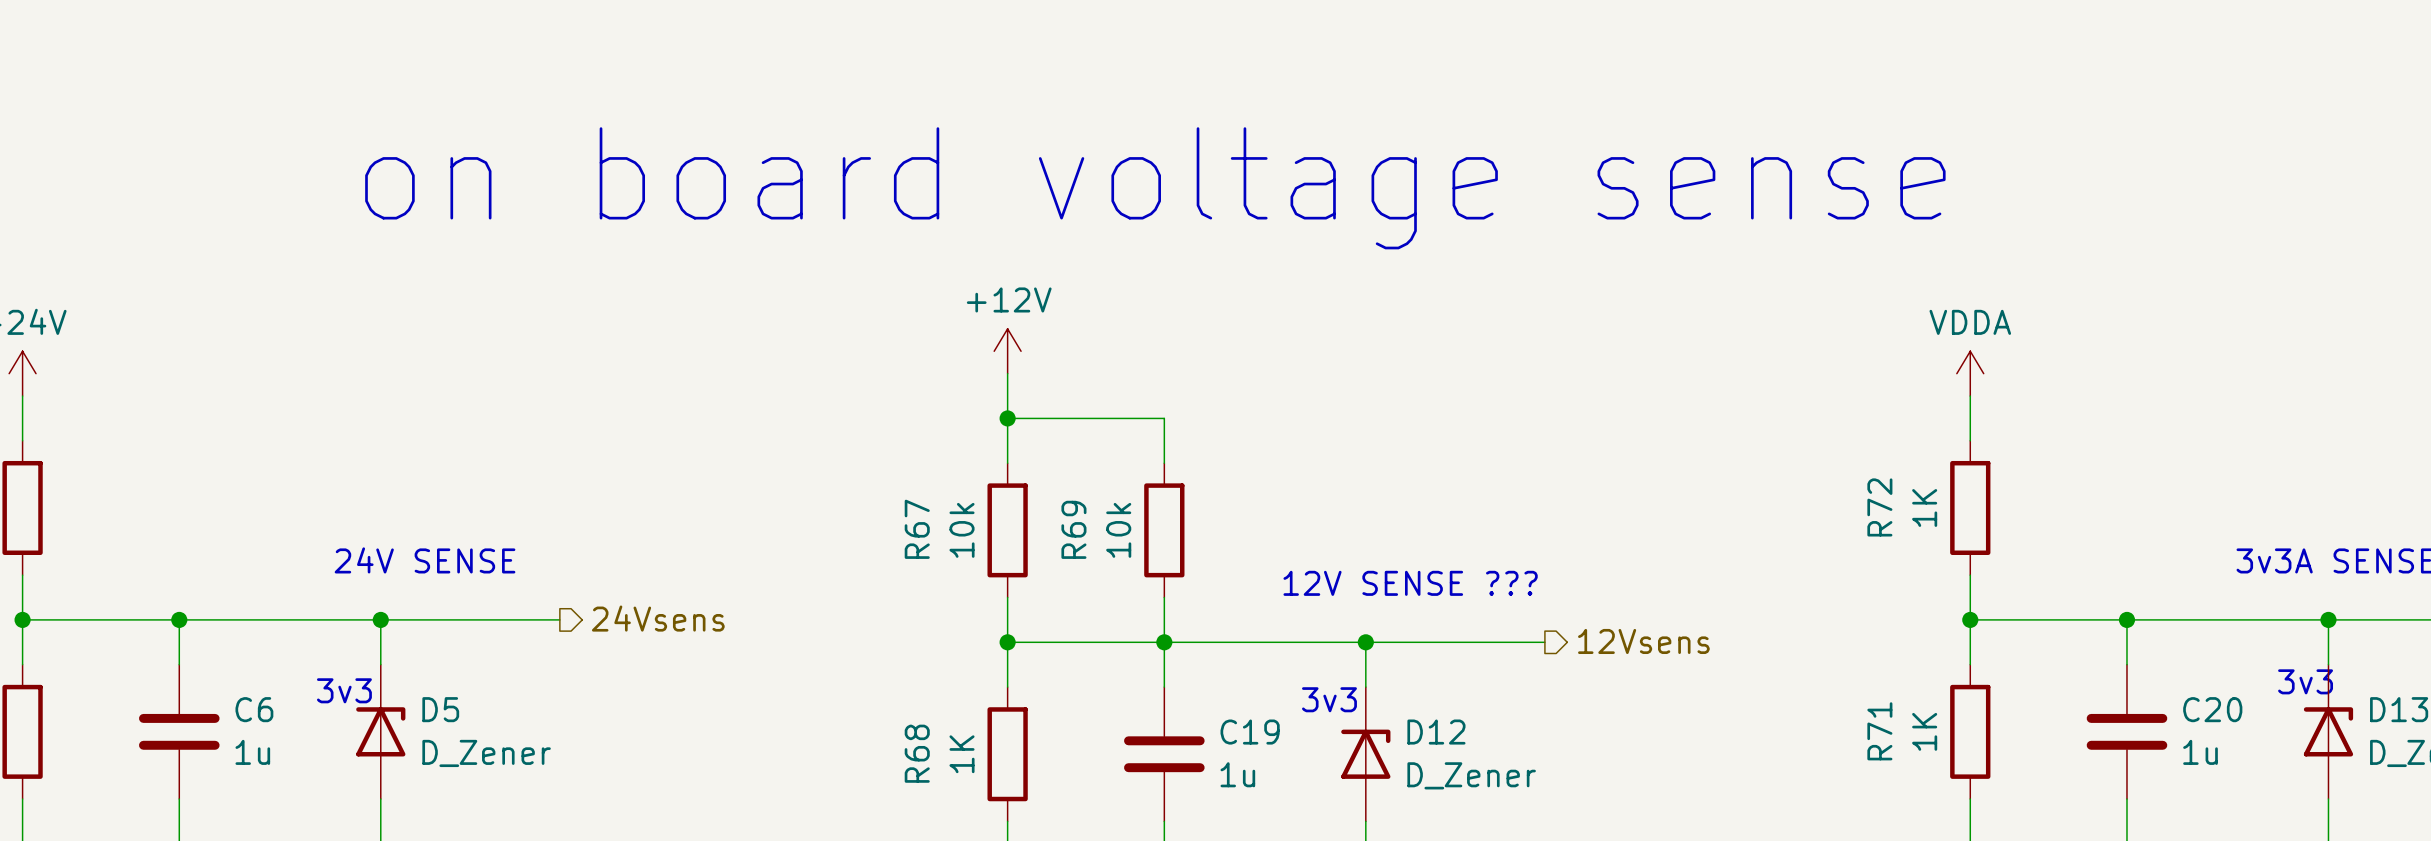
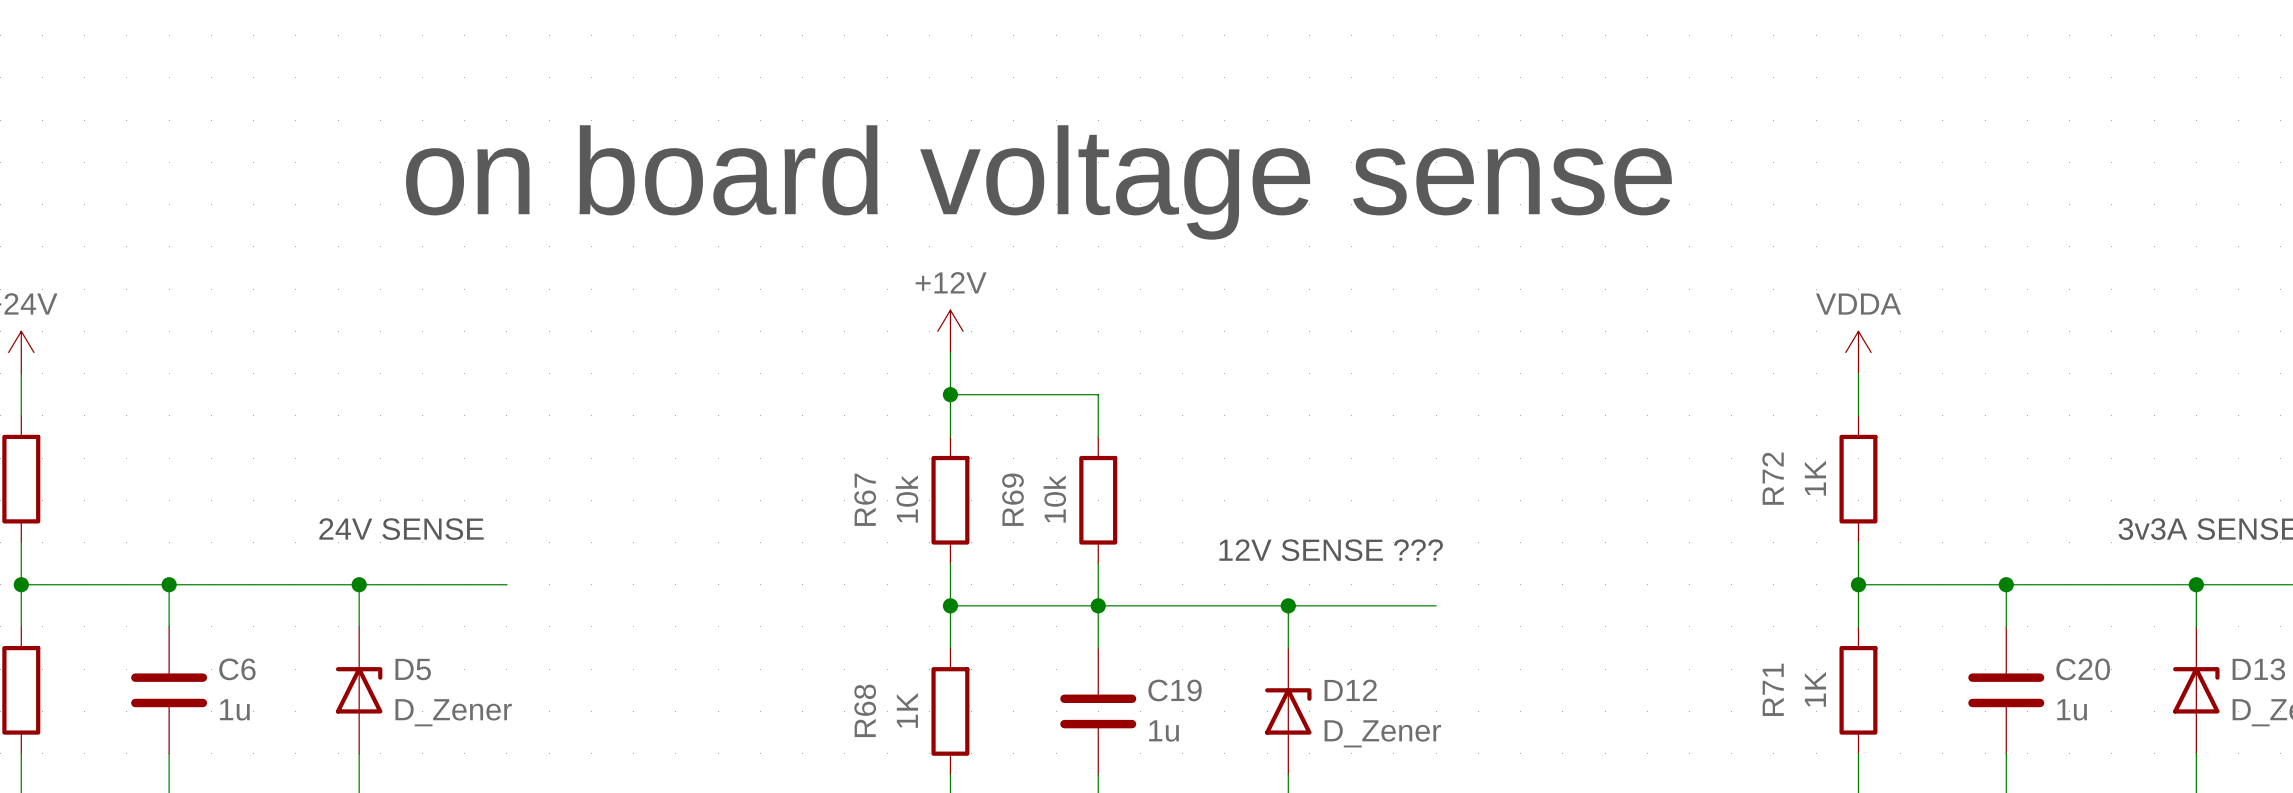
text position: on board voltage sense (1155, 188) -> on board voltage sense (1038, 182)
hierarchical label: 24Vsens (658, 618) -> none
wire: (537, 619) (559, 619) -> none
hierarchical label: 12Vsens (1643, 641) -> none
wire: (1522, 642) (1544, 642) -> none
text: 3v3 (2305, 681) -> none
text: 3v3 (344, 690) -> none
text: 3v3 (1329, 699) -> none

